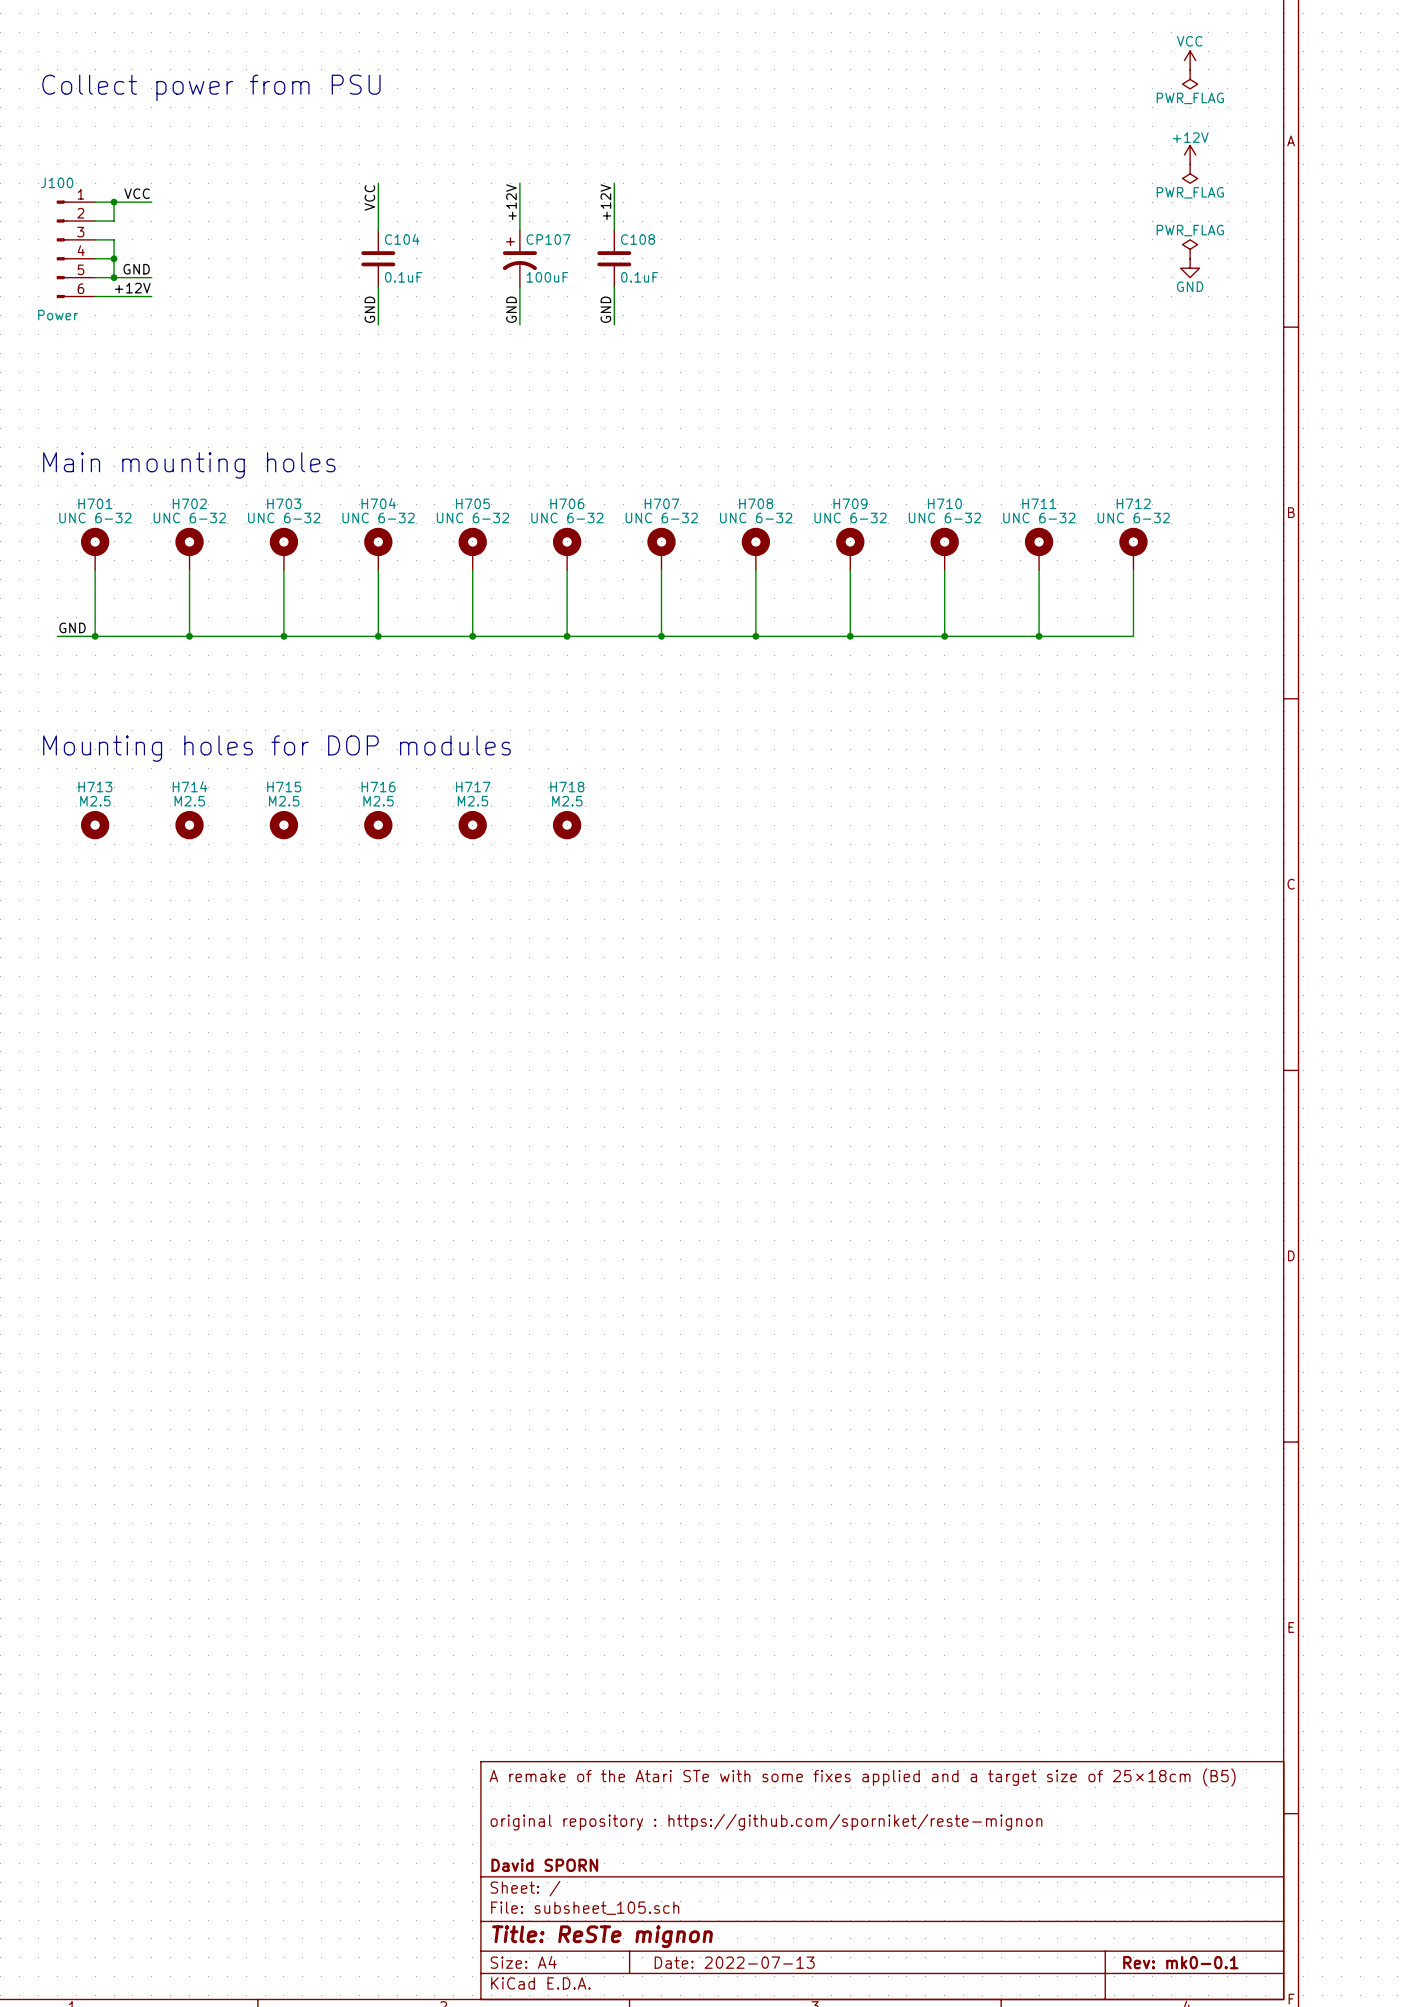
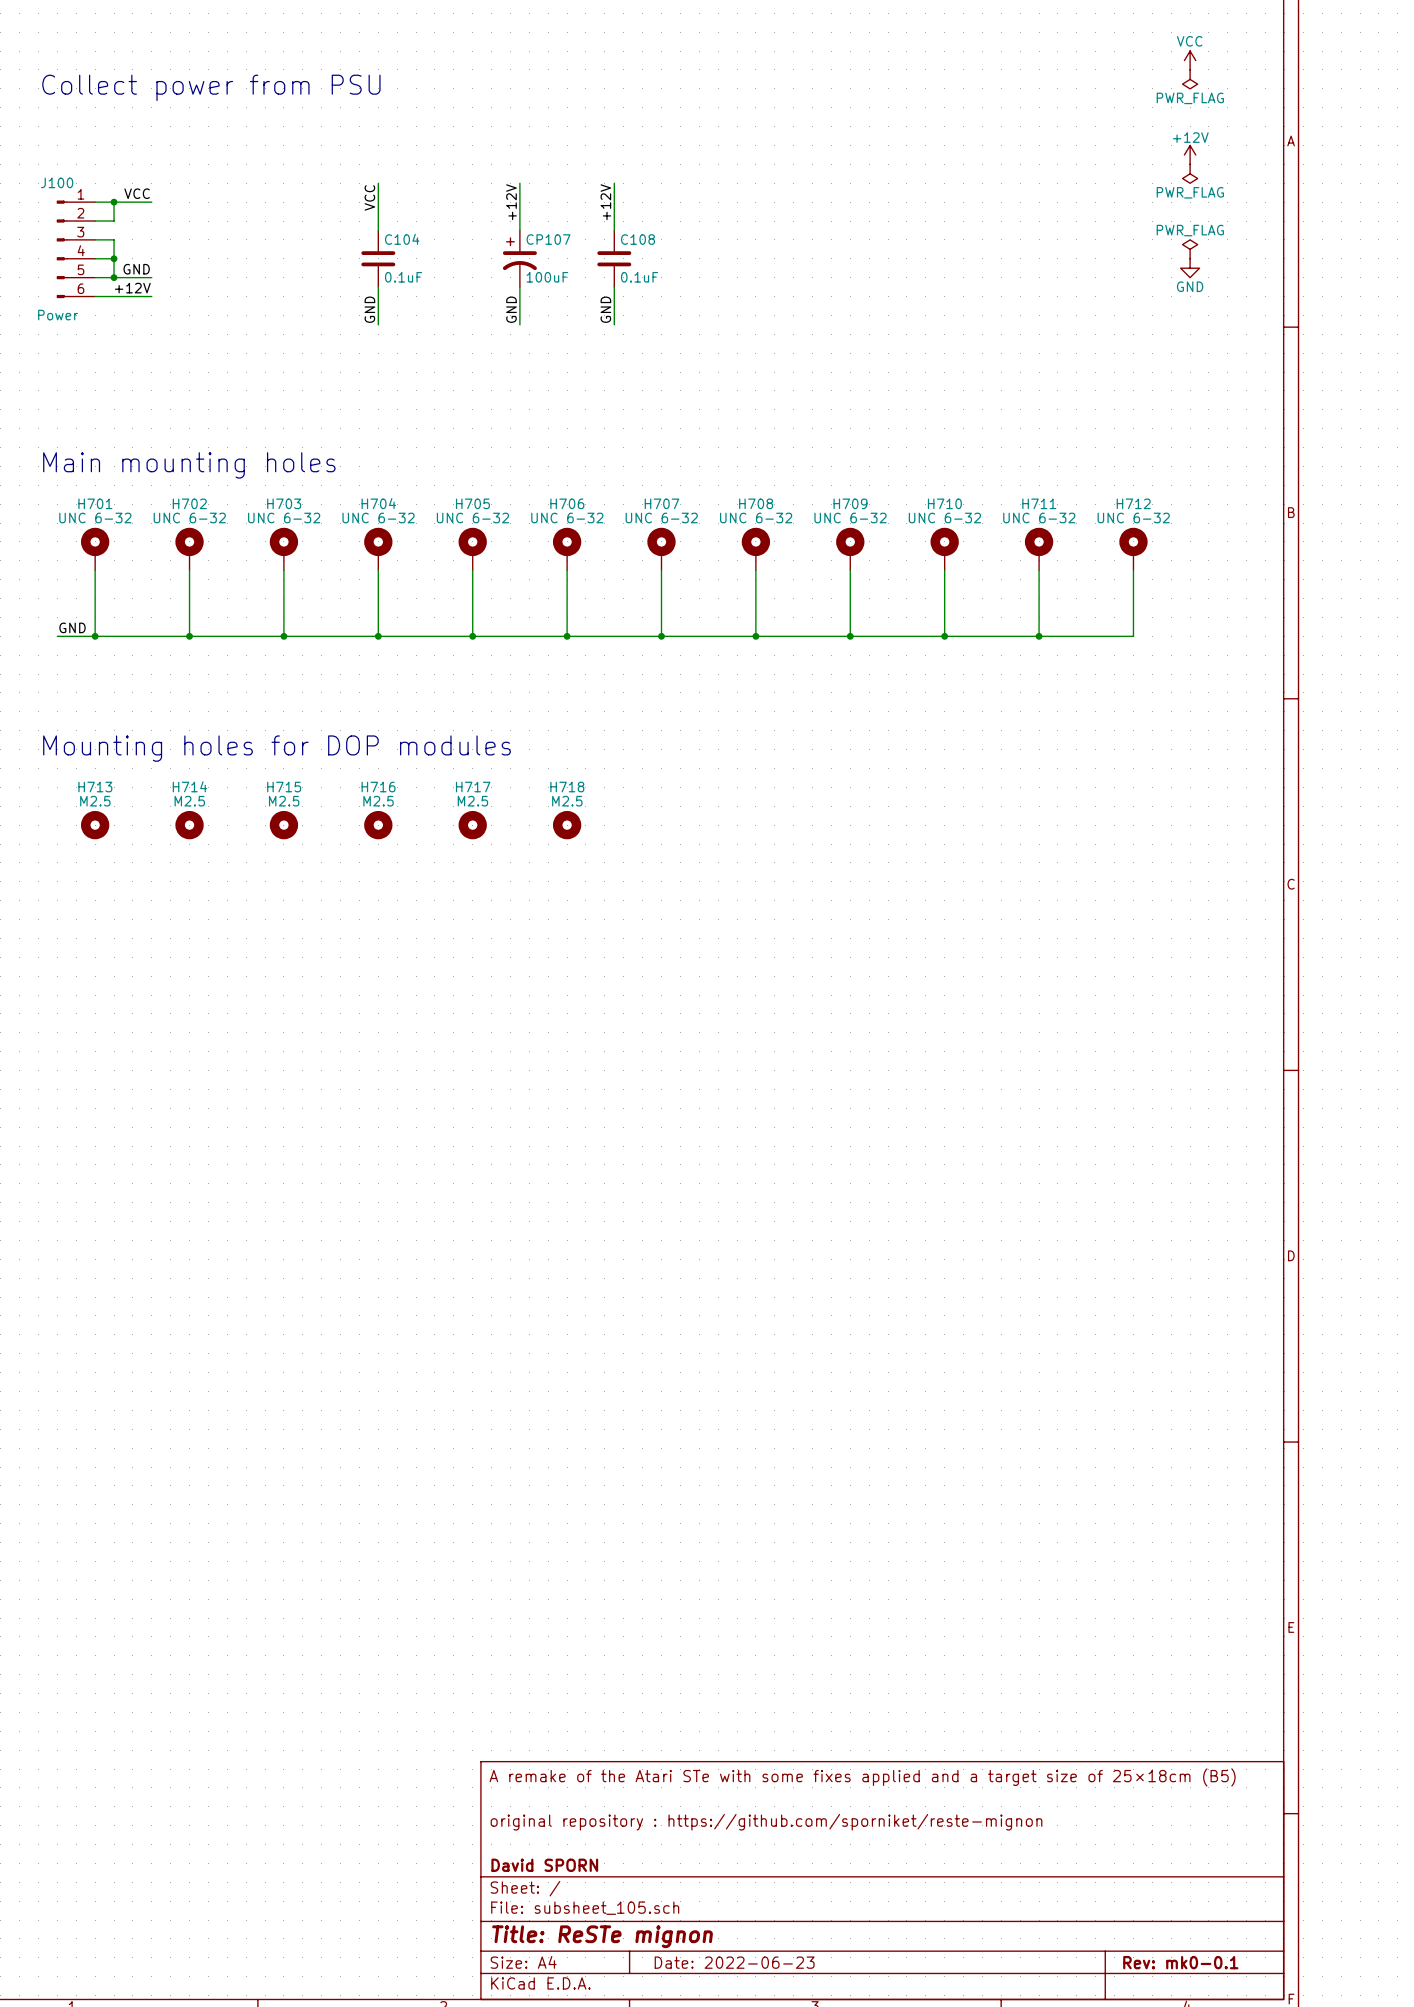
title block: Date: 2022-07-13 (734, 1962) -> Date: 2022-06-23 (734, 1962)

